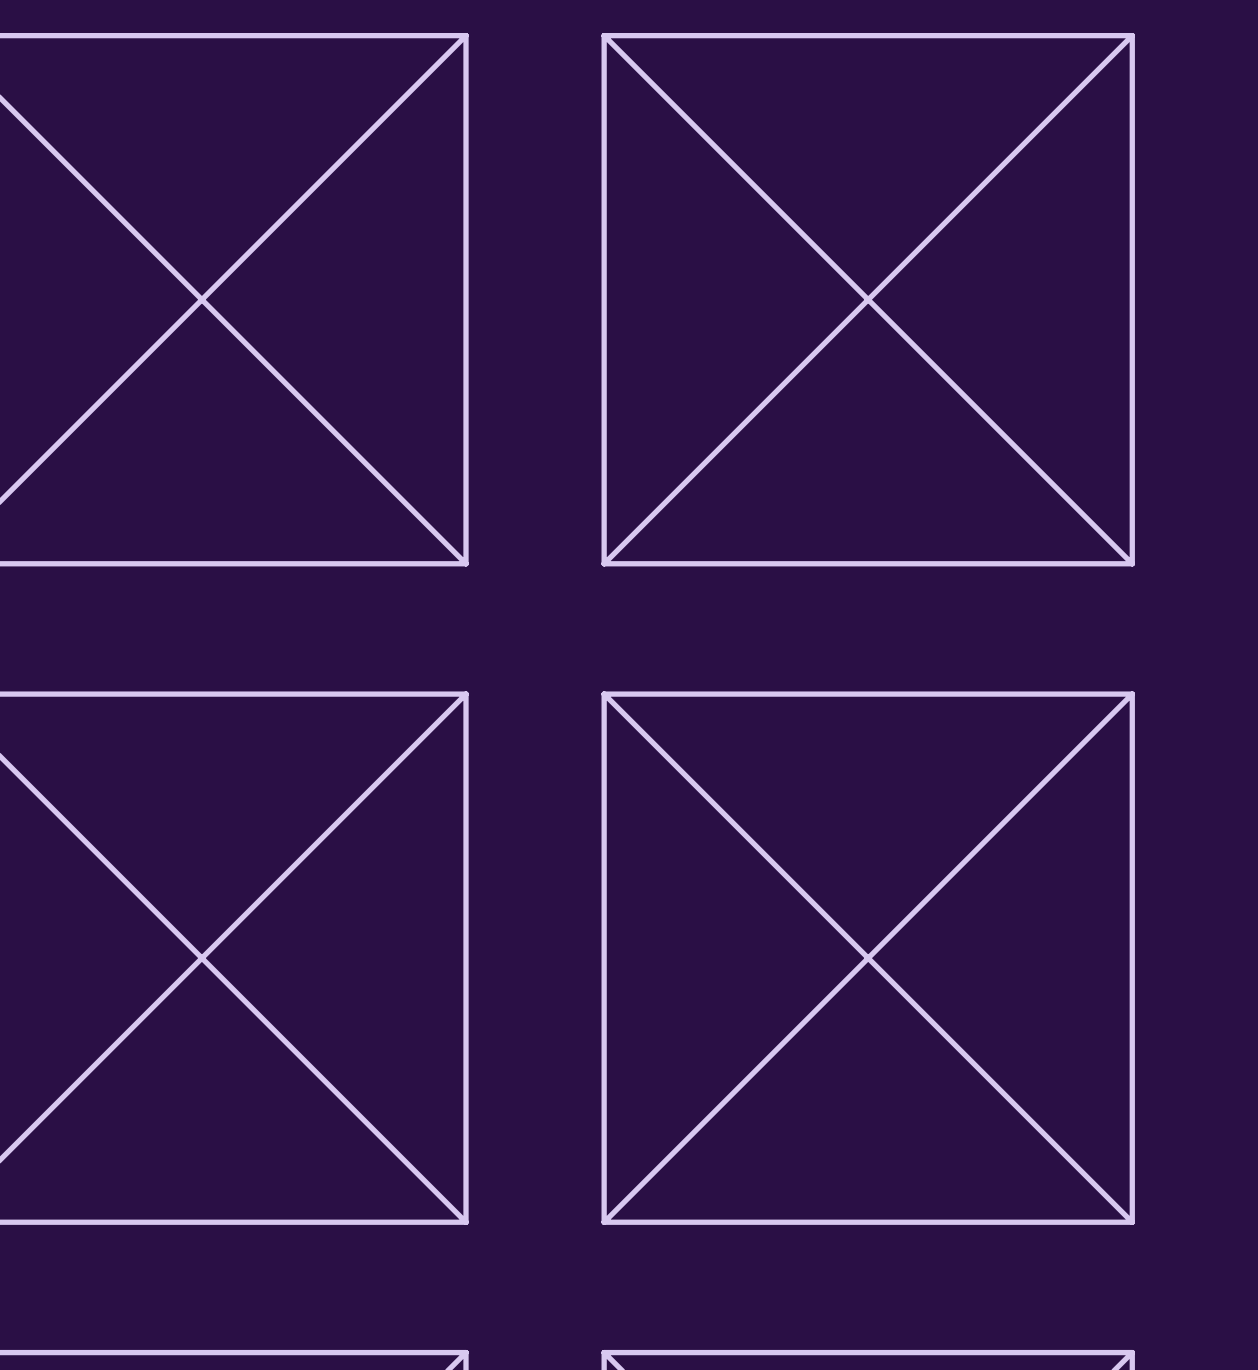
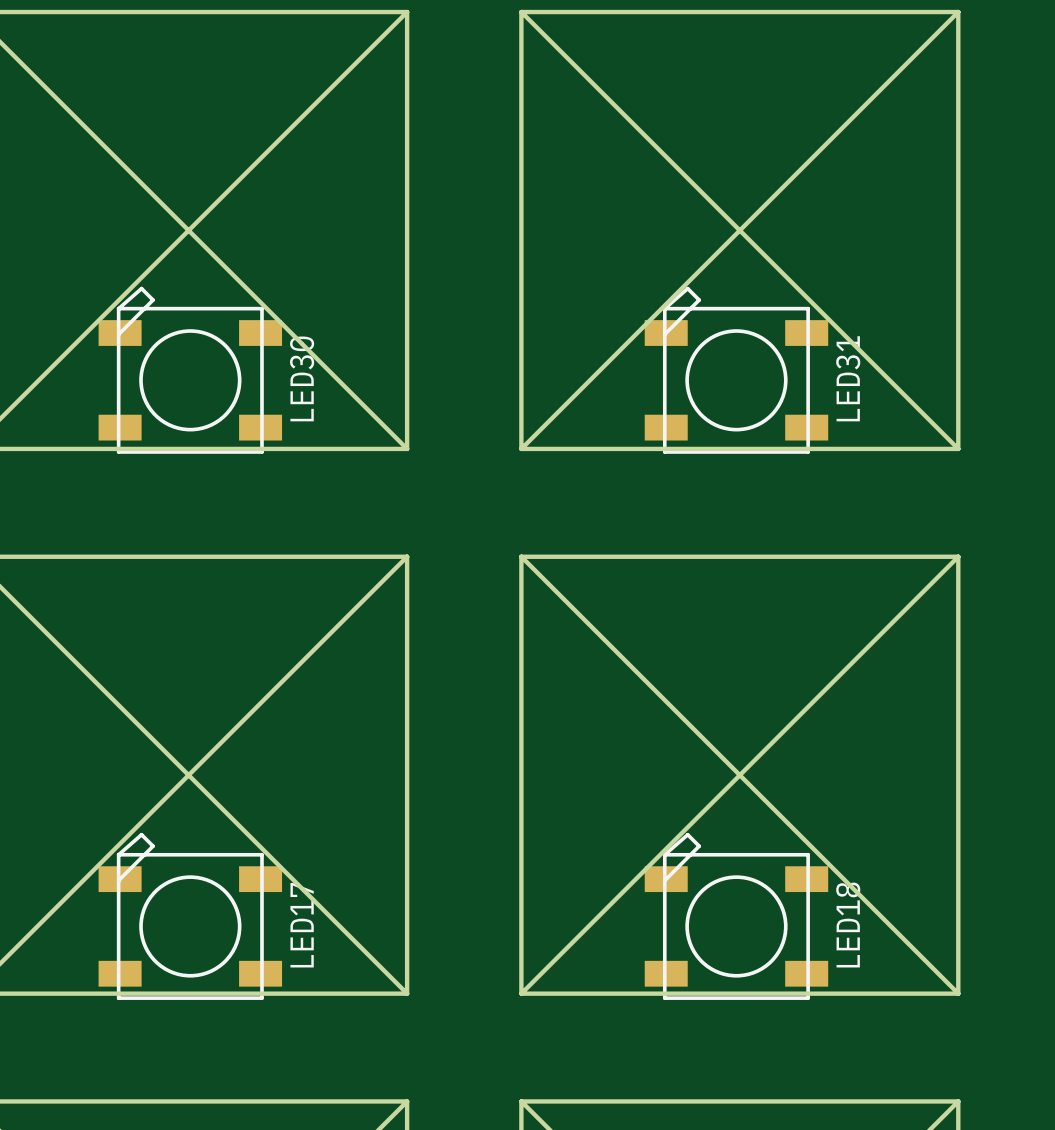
LED30: none -> (190, 370)
LED31: none -> (736, 370)
LED17: none -> (190, 916)
LED18: none -> (736, 916)

